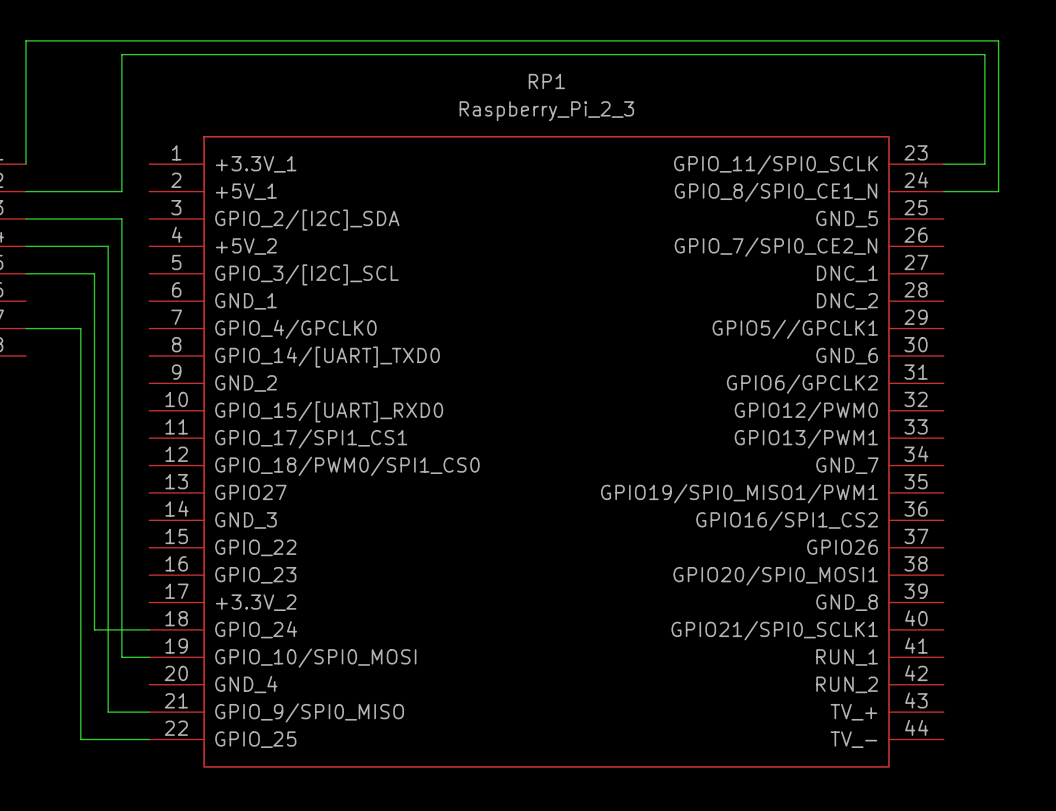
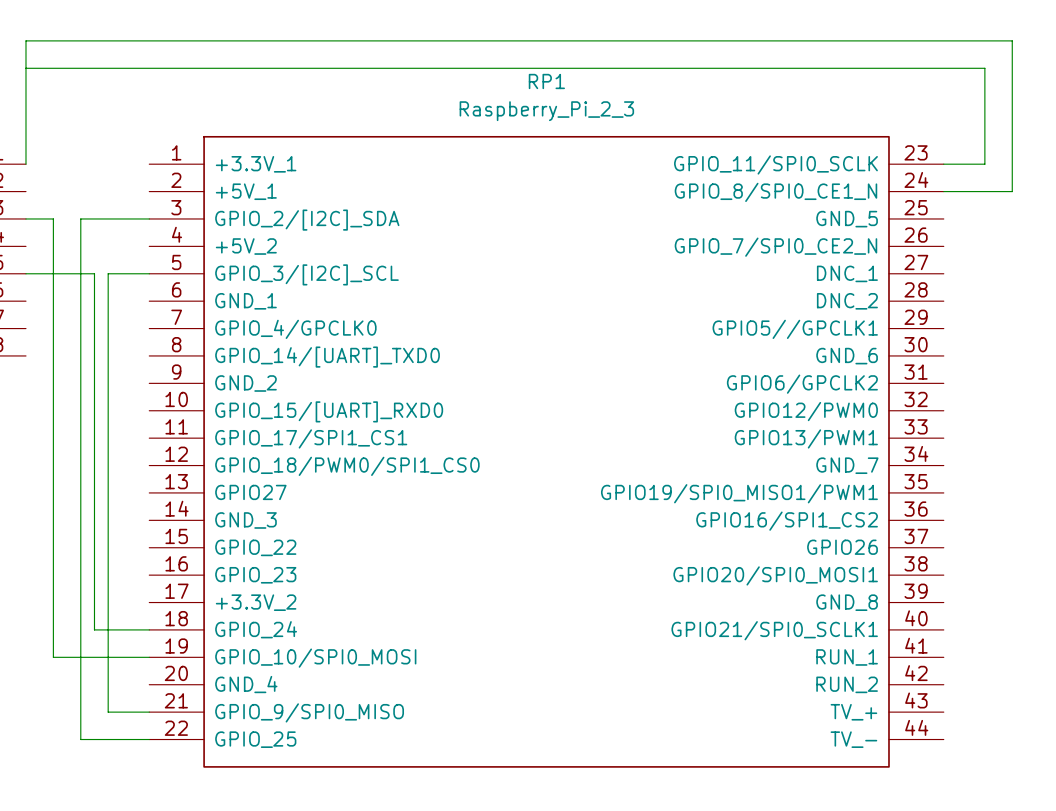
wire: (998, 40) (998, 191) -> (998, 40) (1012, 40) (1012, 191) (998, 191)
wire: (984, 68) (984, 54) (121, 54) (121, 191) (25, 191) -> (984, 68) (25, 68)
wire: (53, 218) (80, 218) -> (80, 328) (80, 218)
wire: (121, 218) (121, 657) -> (53, 218) (53, 657) (121, 657)
wire: none -> (121, 218) (149, 218)
wire: (25, 246) (108, 246) (108, 273) -> (149, 273) (108, 273)
wire: (25, 328) (80, 328) -> none

